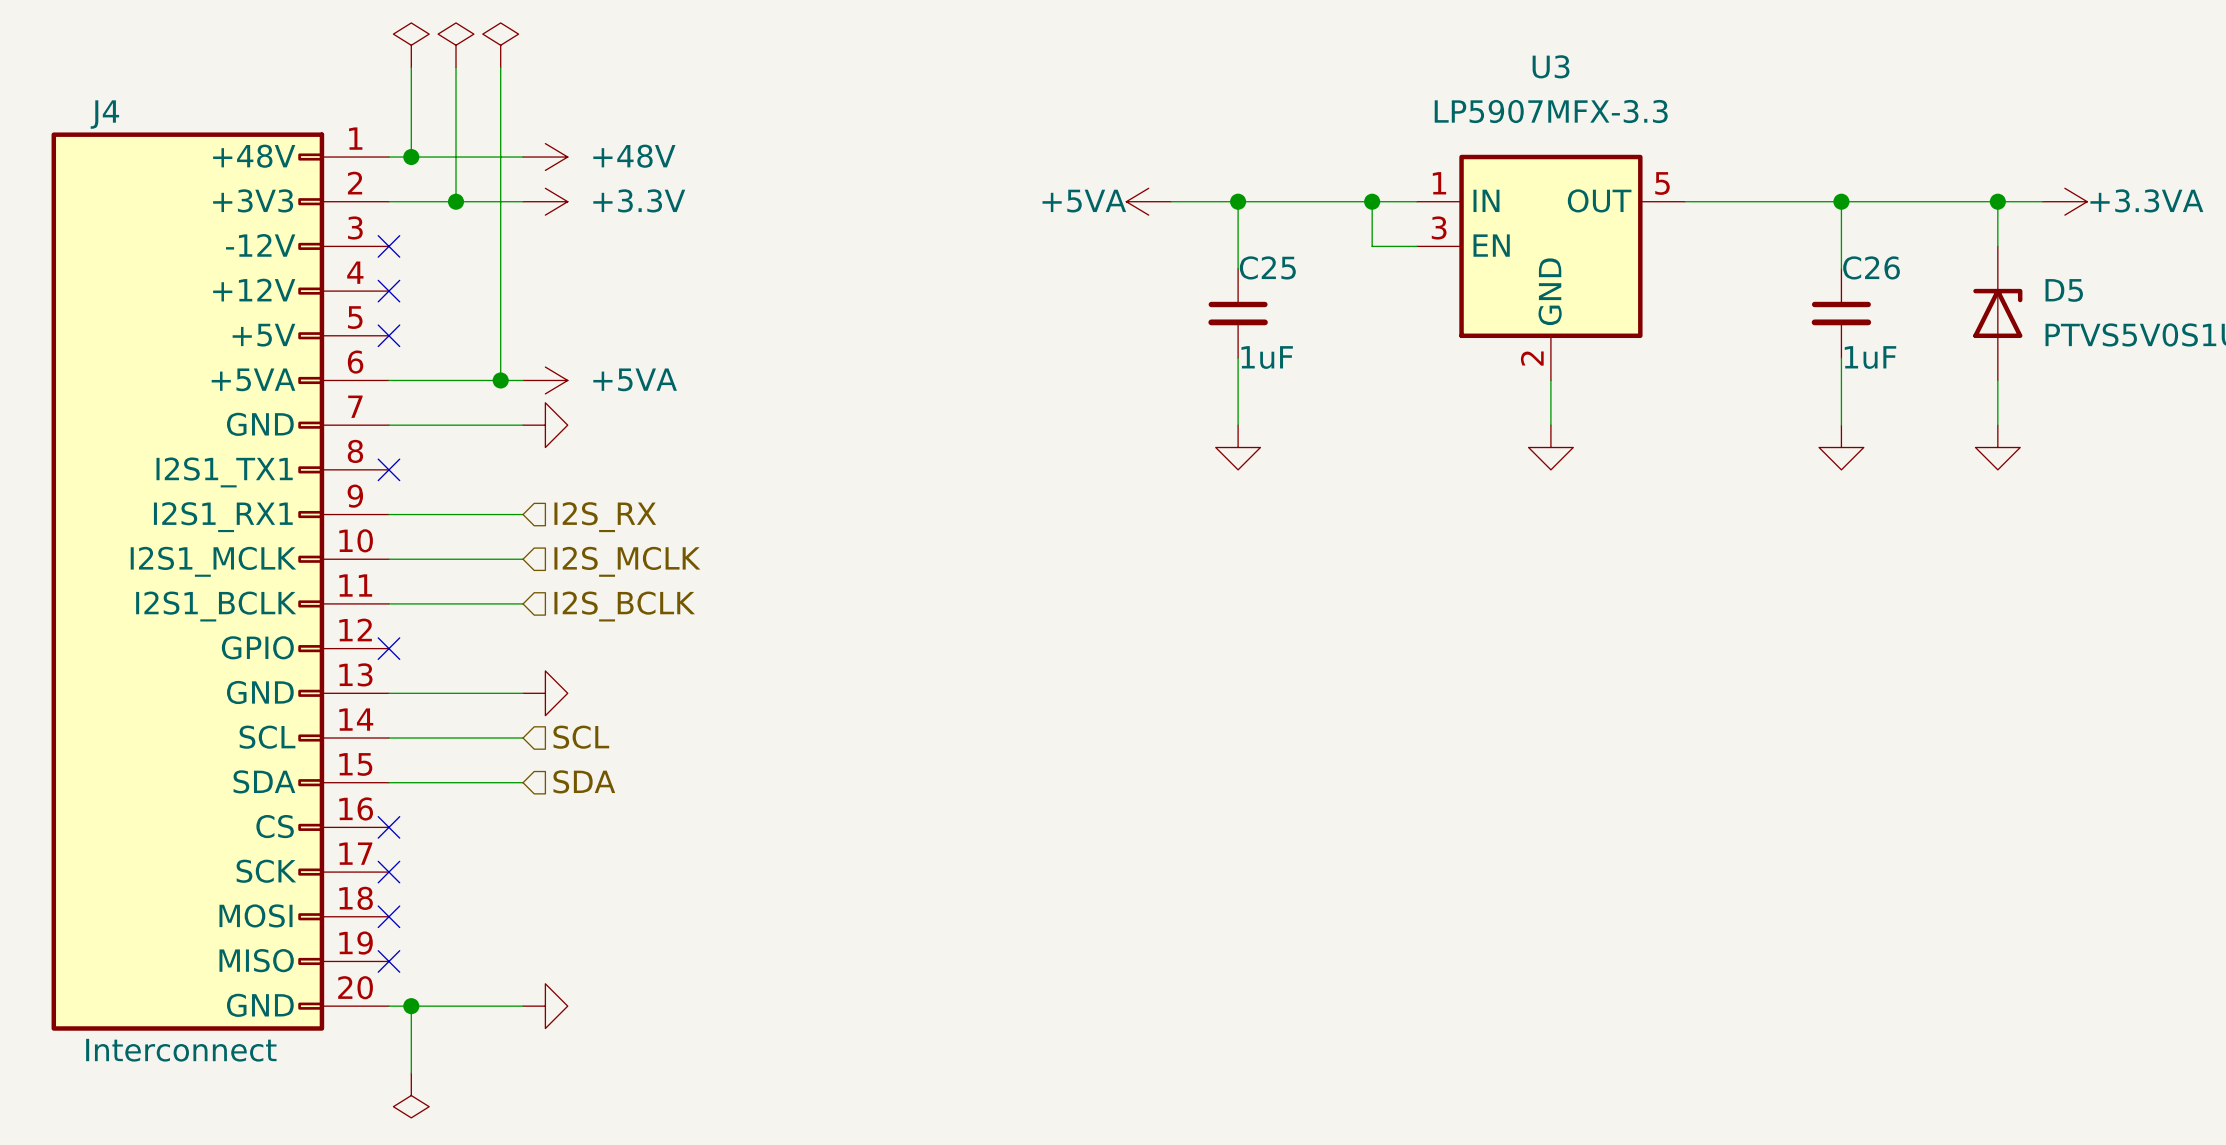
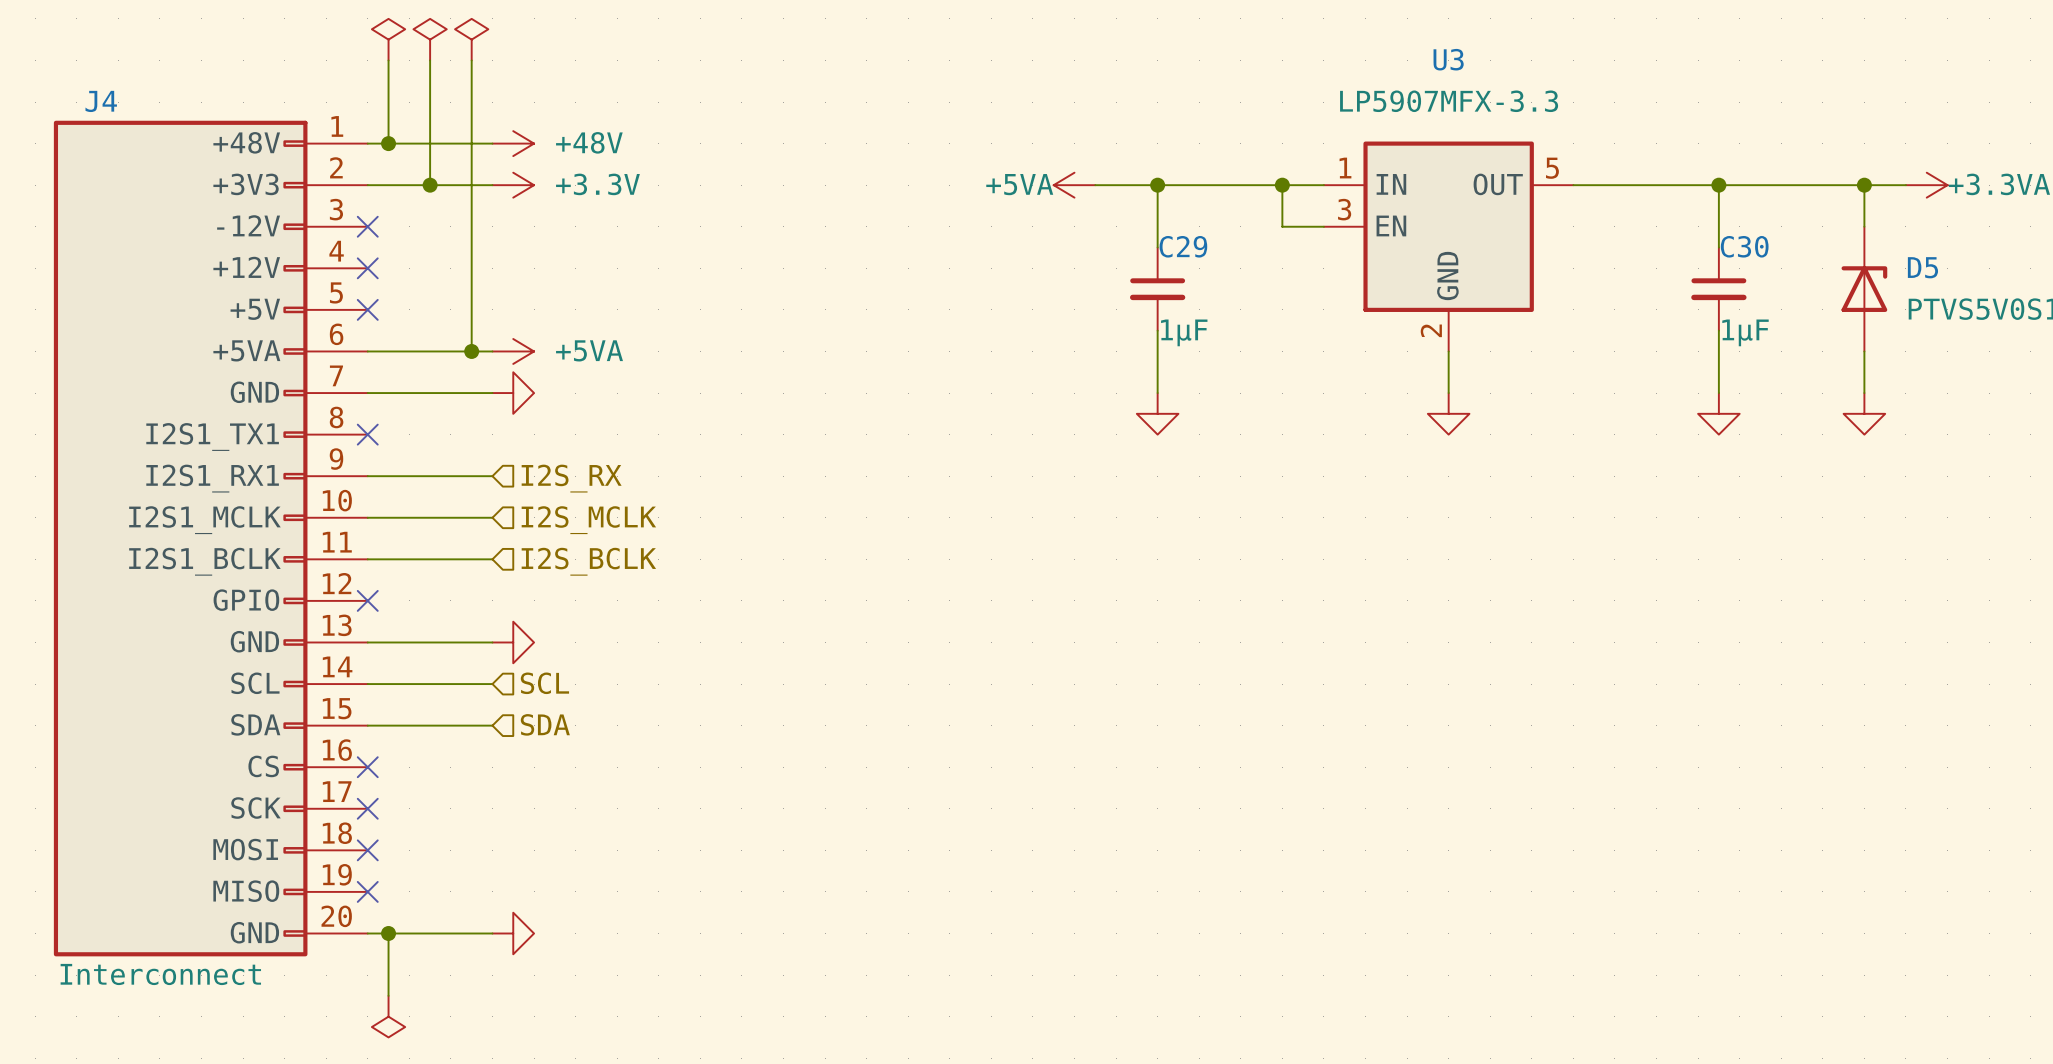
C25 name: C25 (1267, 267) -> C29 (1183, 246)
C26 name: C26 (1871, 267) -> C30 (1744, 246)
C25 value: 1uF (1267, 357) -> 1μF (1184, 332)
C26 value: 1uF (1870, 357) -> 1μF (1745, 332)

